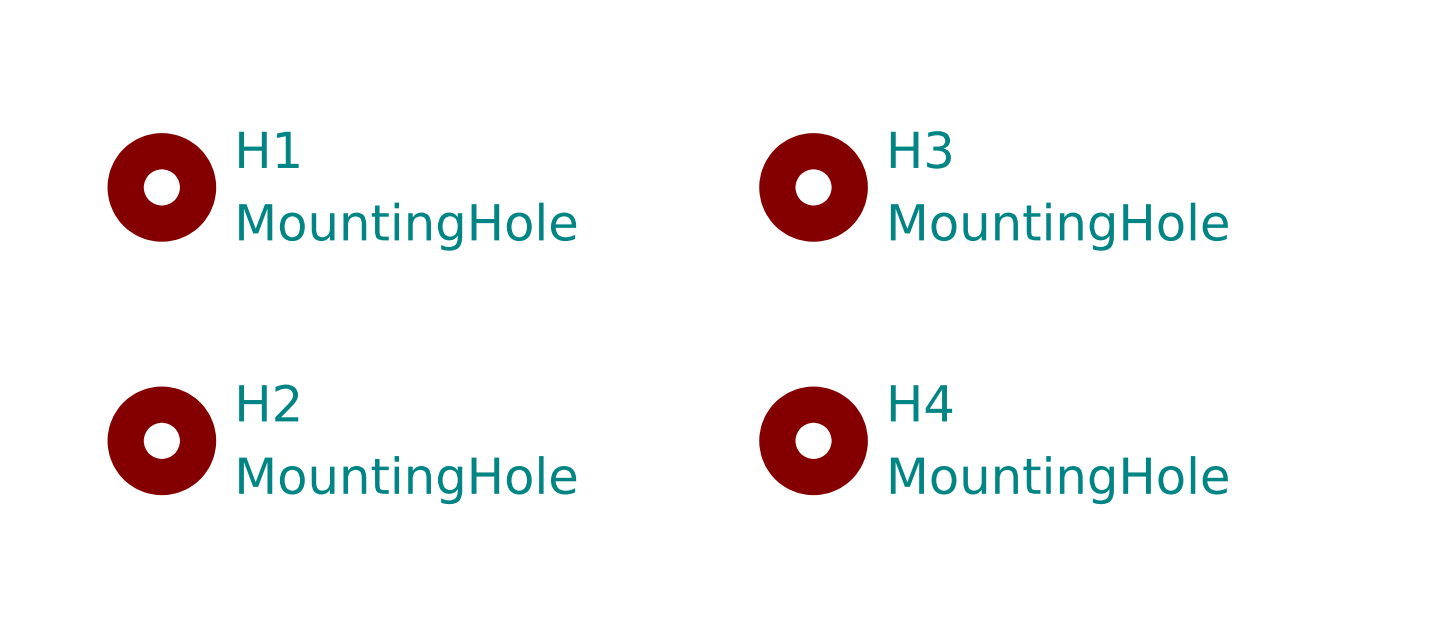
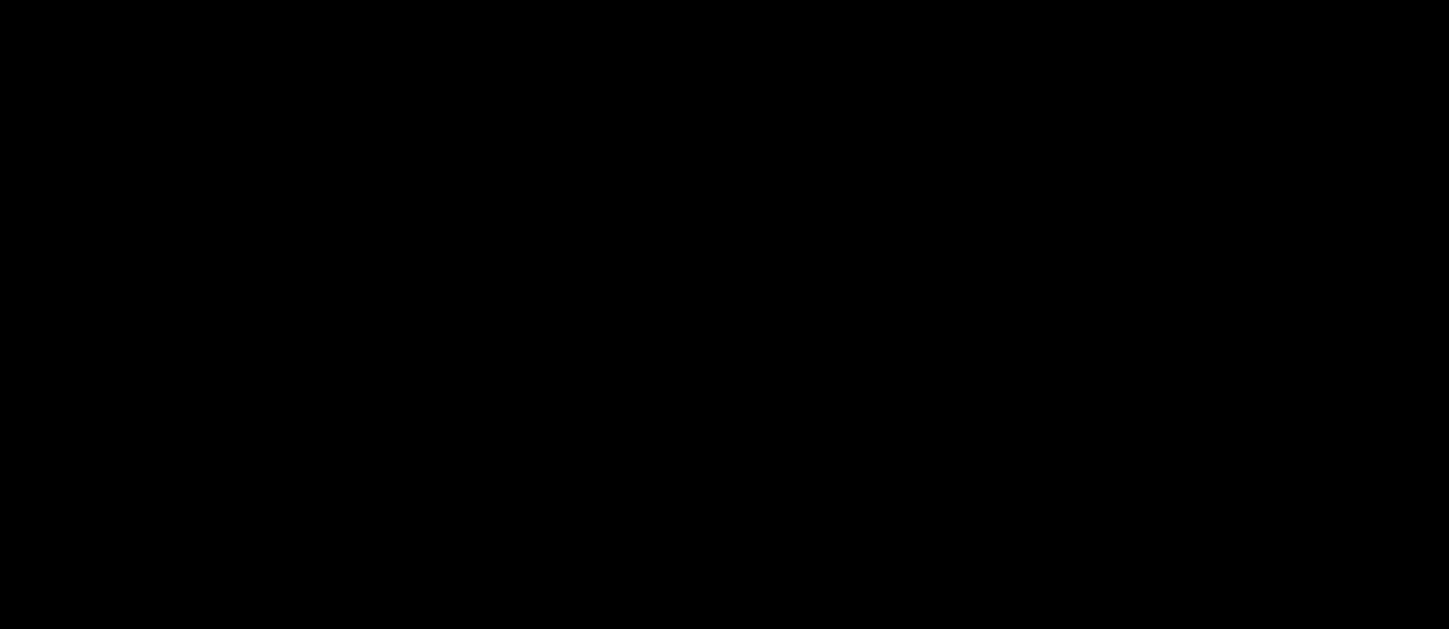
H1: MountingHole (161, 187) -> none
H3: MountingHole (813, 187) -> none
H2: MountingHole (161, 440) -> none
H4: MountingHole (813, 440) -> none

